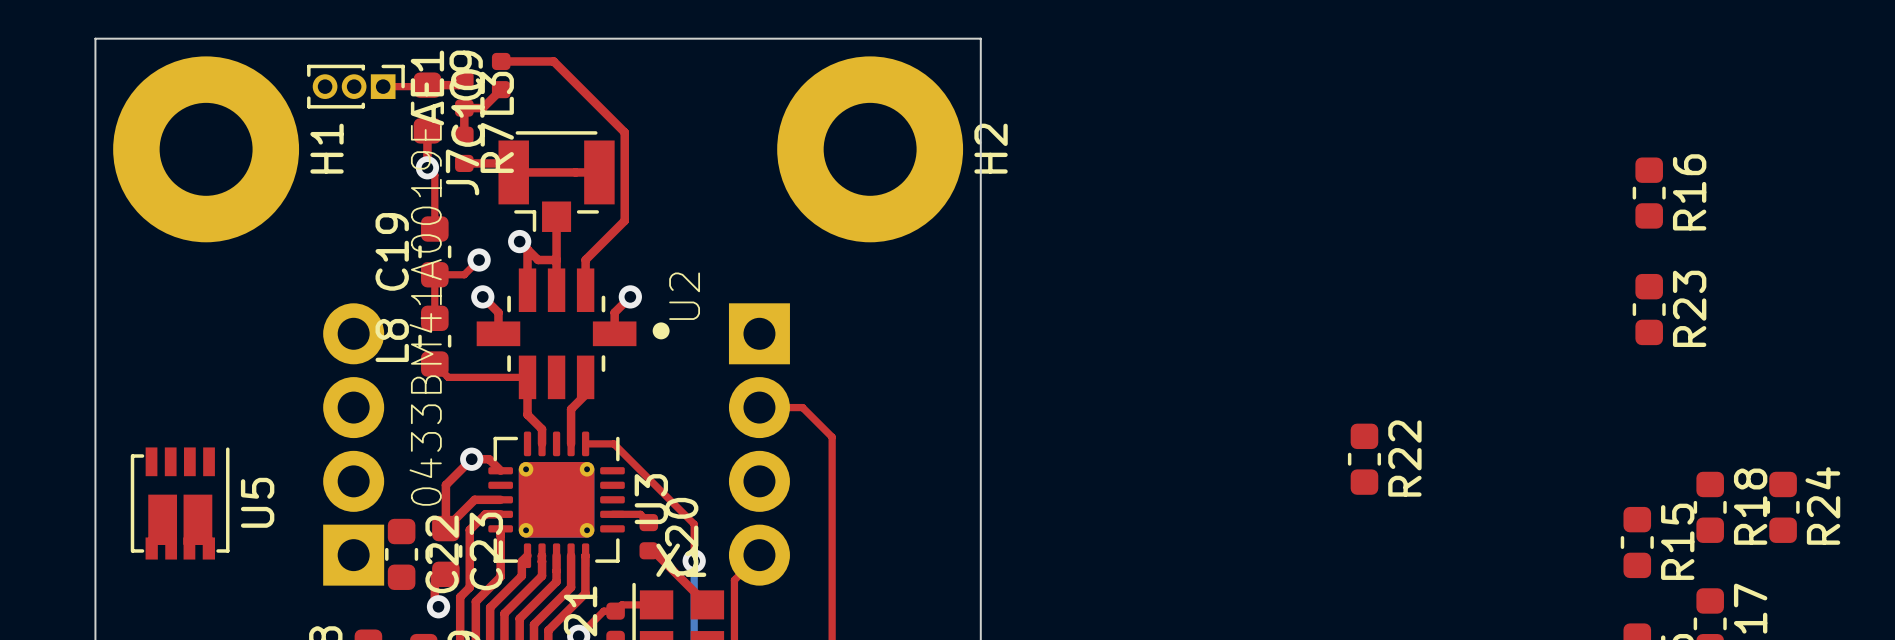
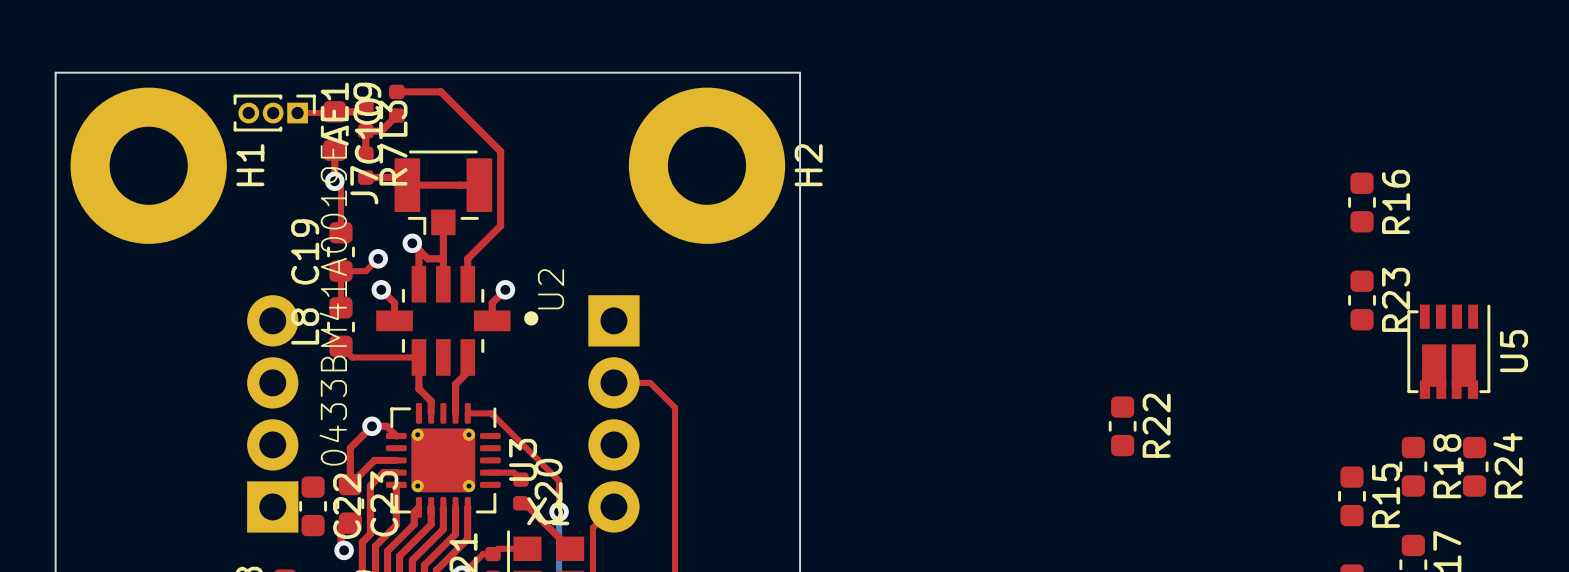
U5 position: (180, 503) -> (1448, 351)

